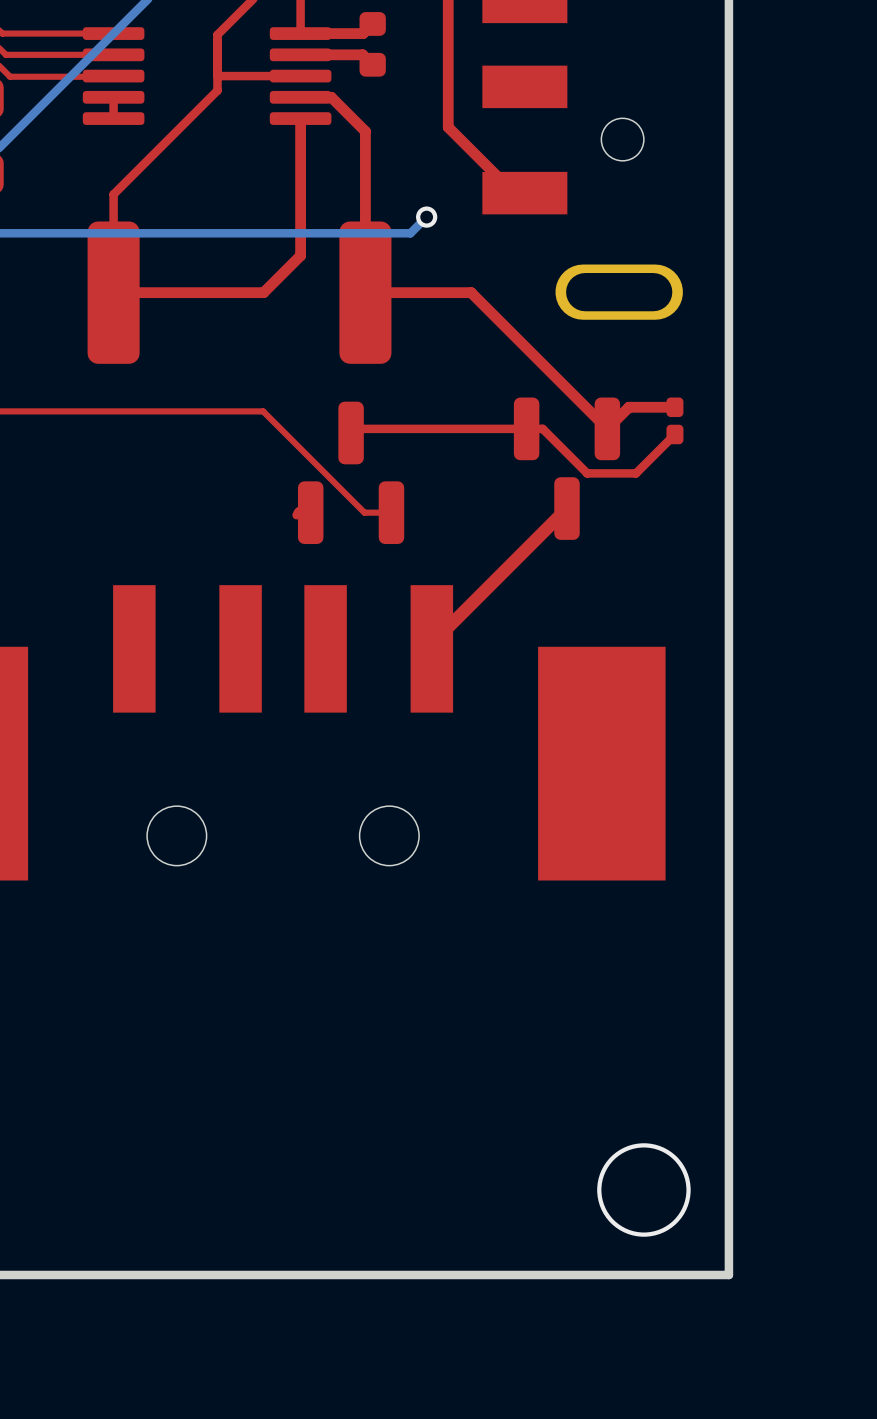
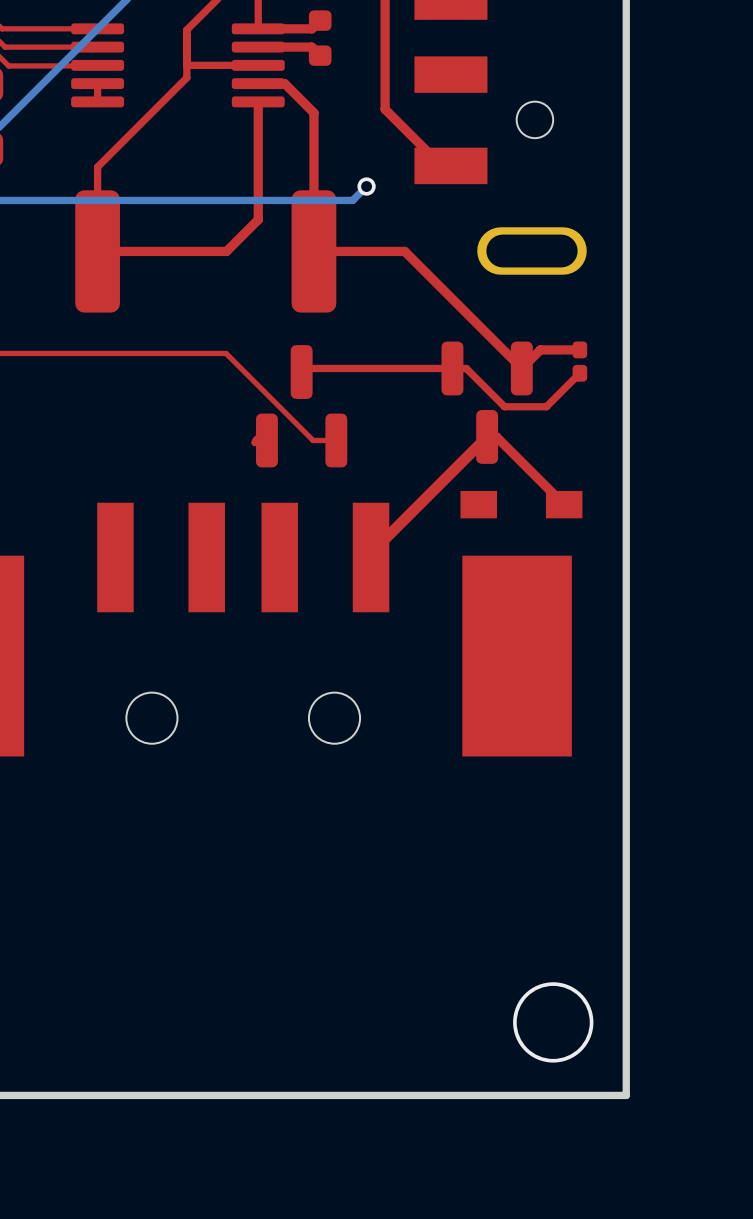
top track: none -> (487, 436) (496, 436) (564, 504)
part: none -> (521, 504)

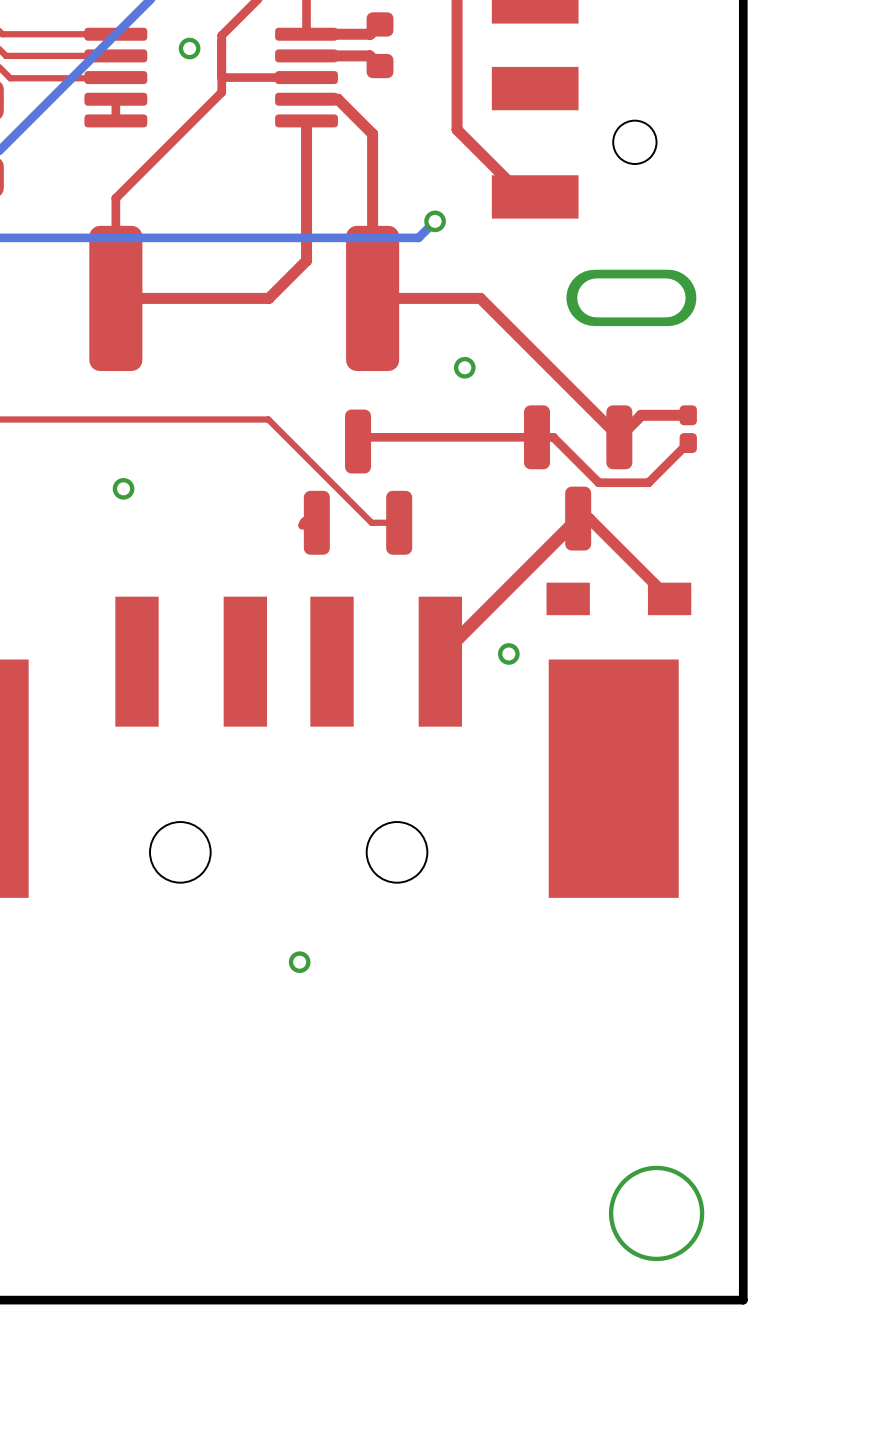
via: none -> (189, 48)
via: none -> (464, 367)
via: none -> (123, 488)
via: none -> (508, 653)
via: none -> (299, 962)

